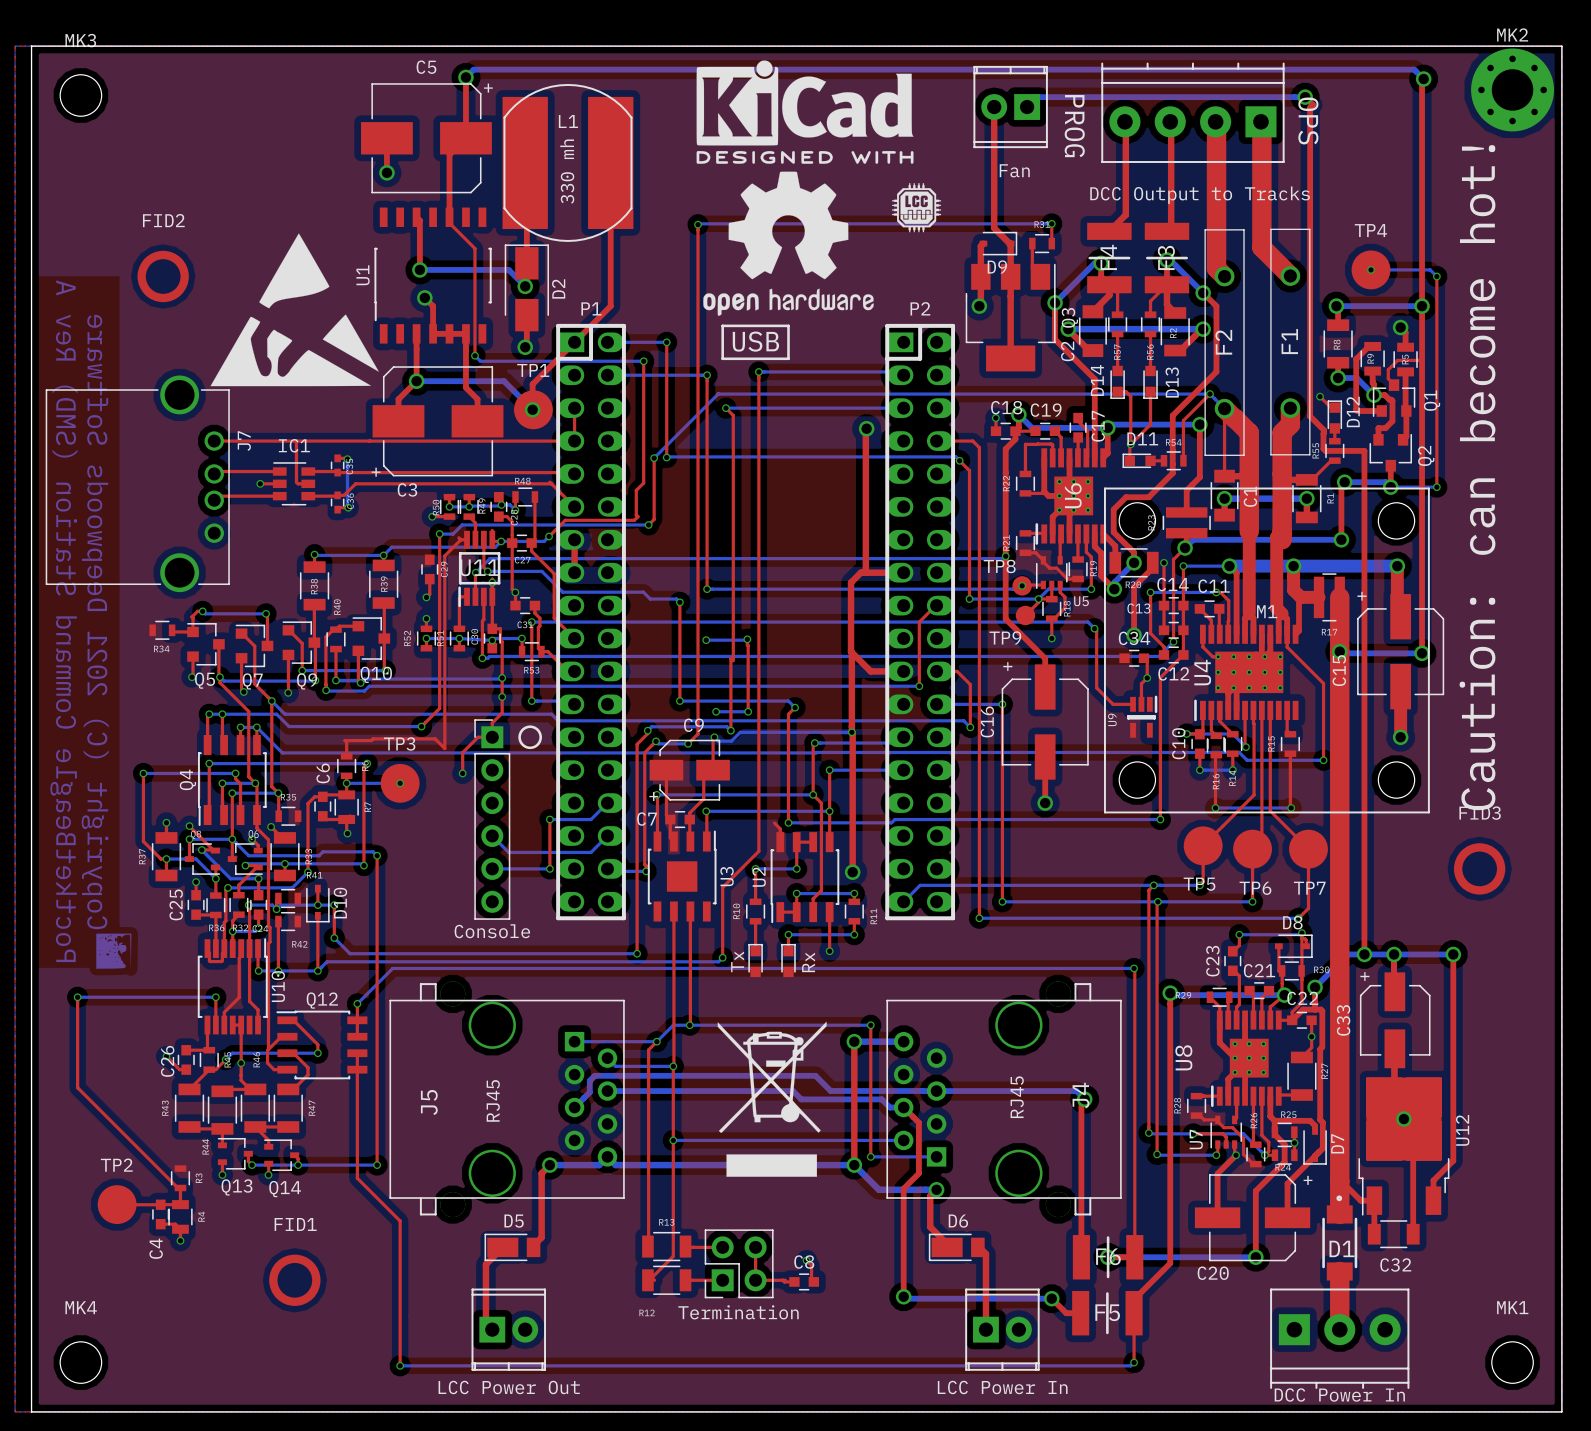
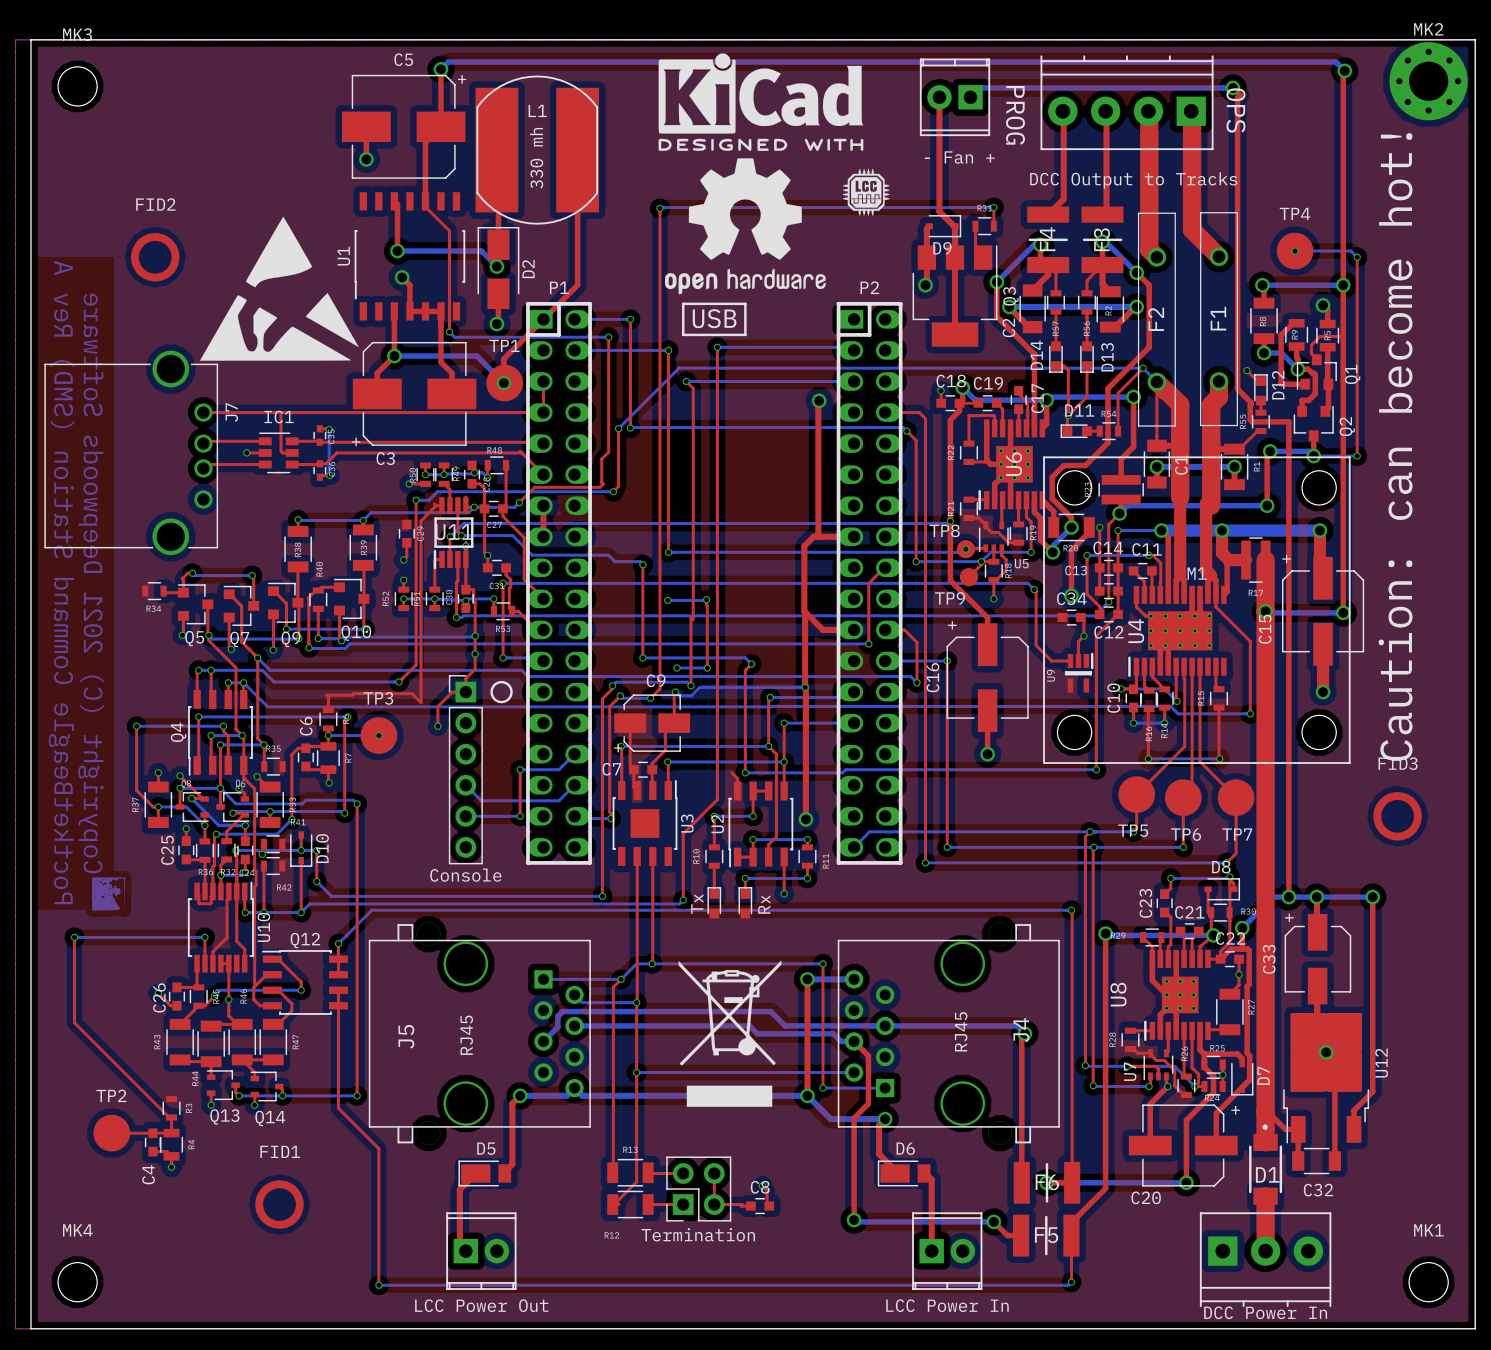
part value: Fan (1014, 170) -> - Fan + (959, 157)

